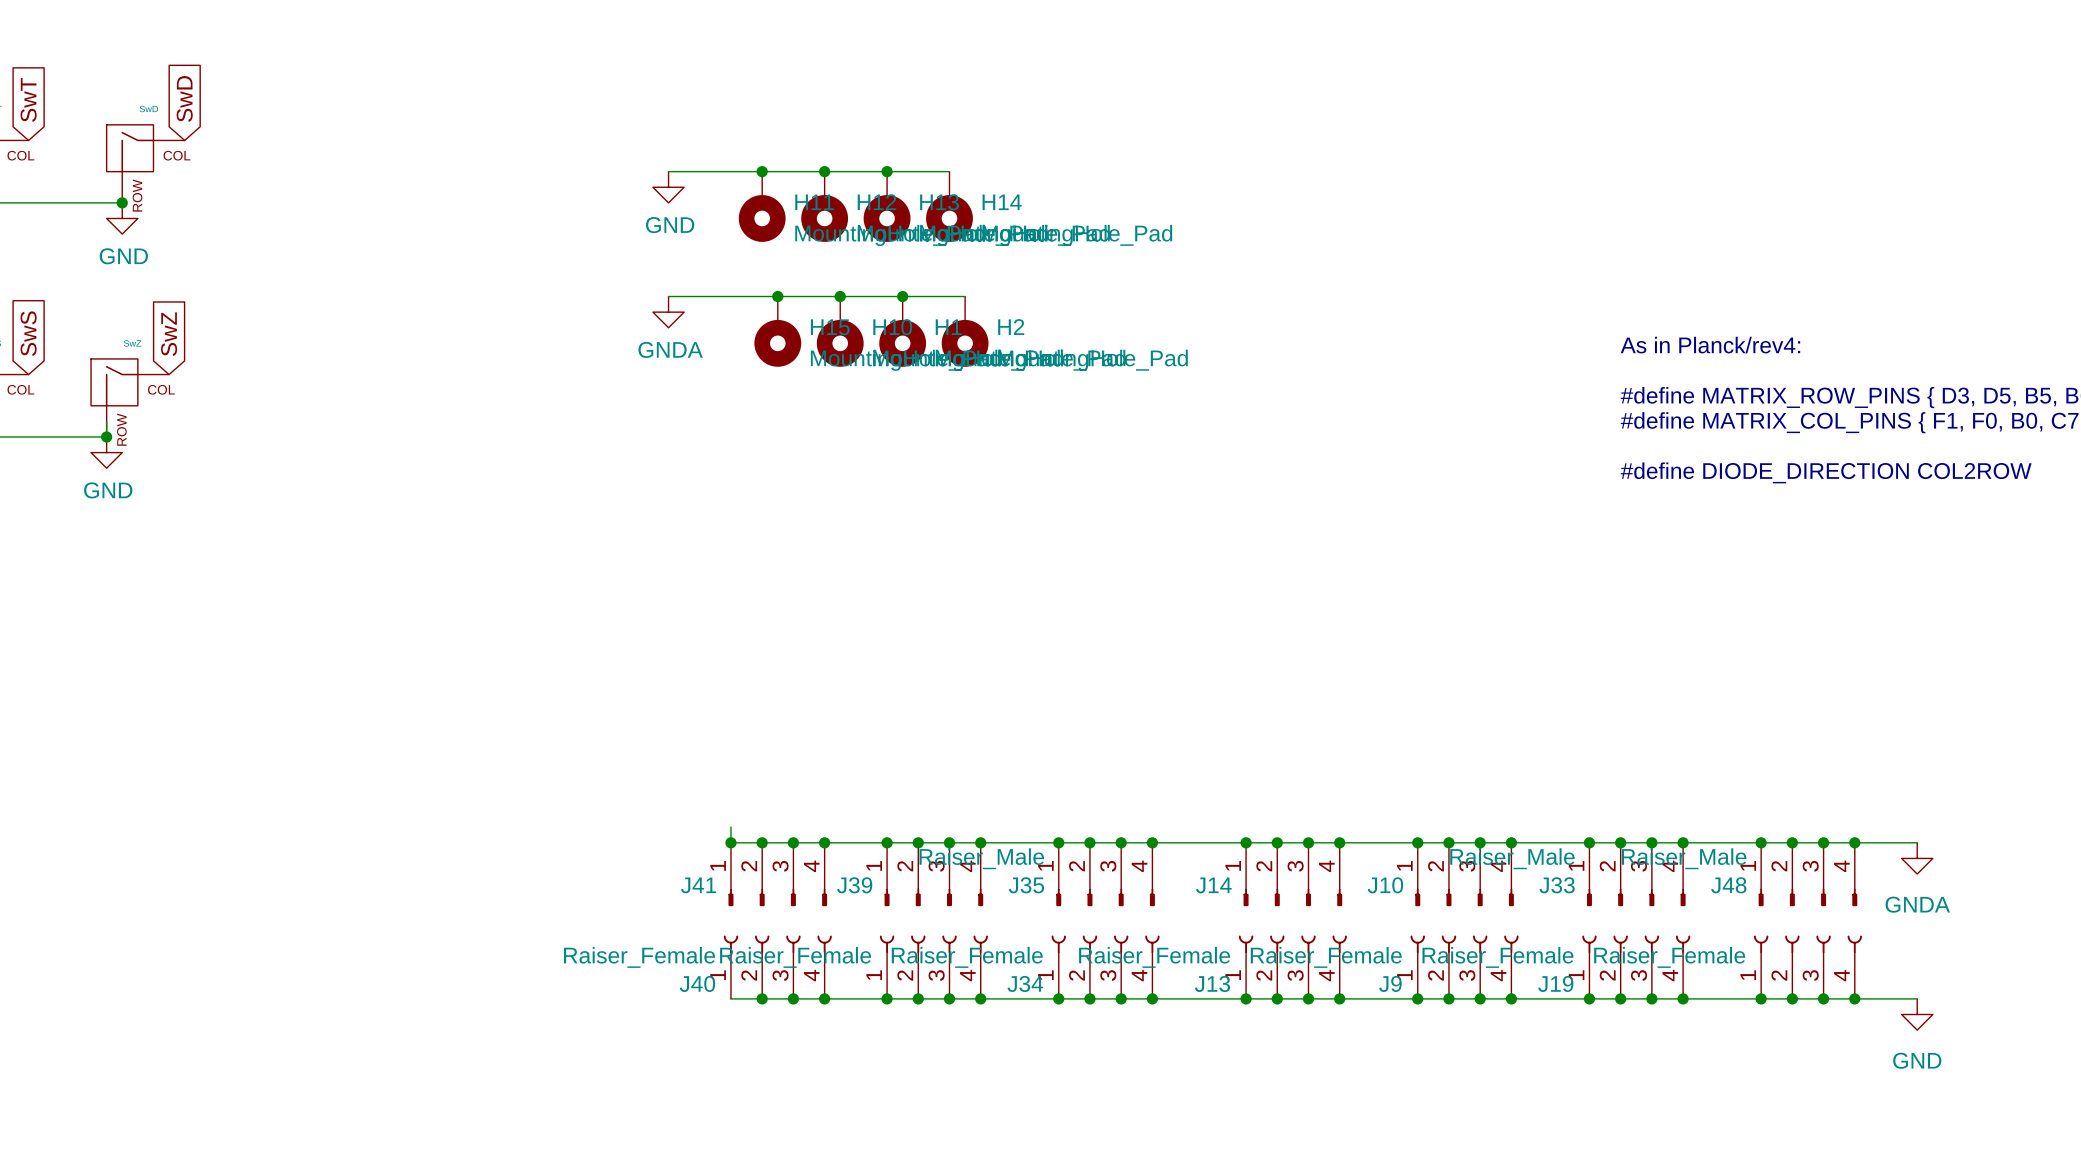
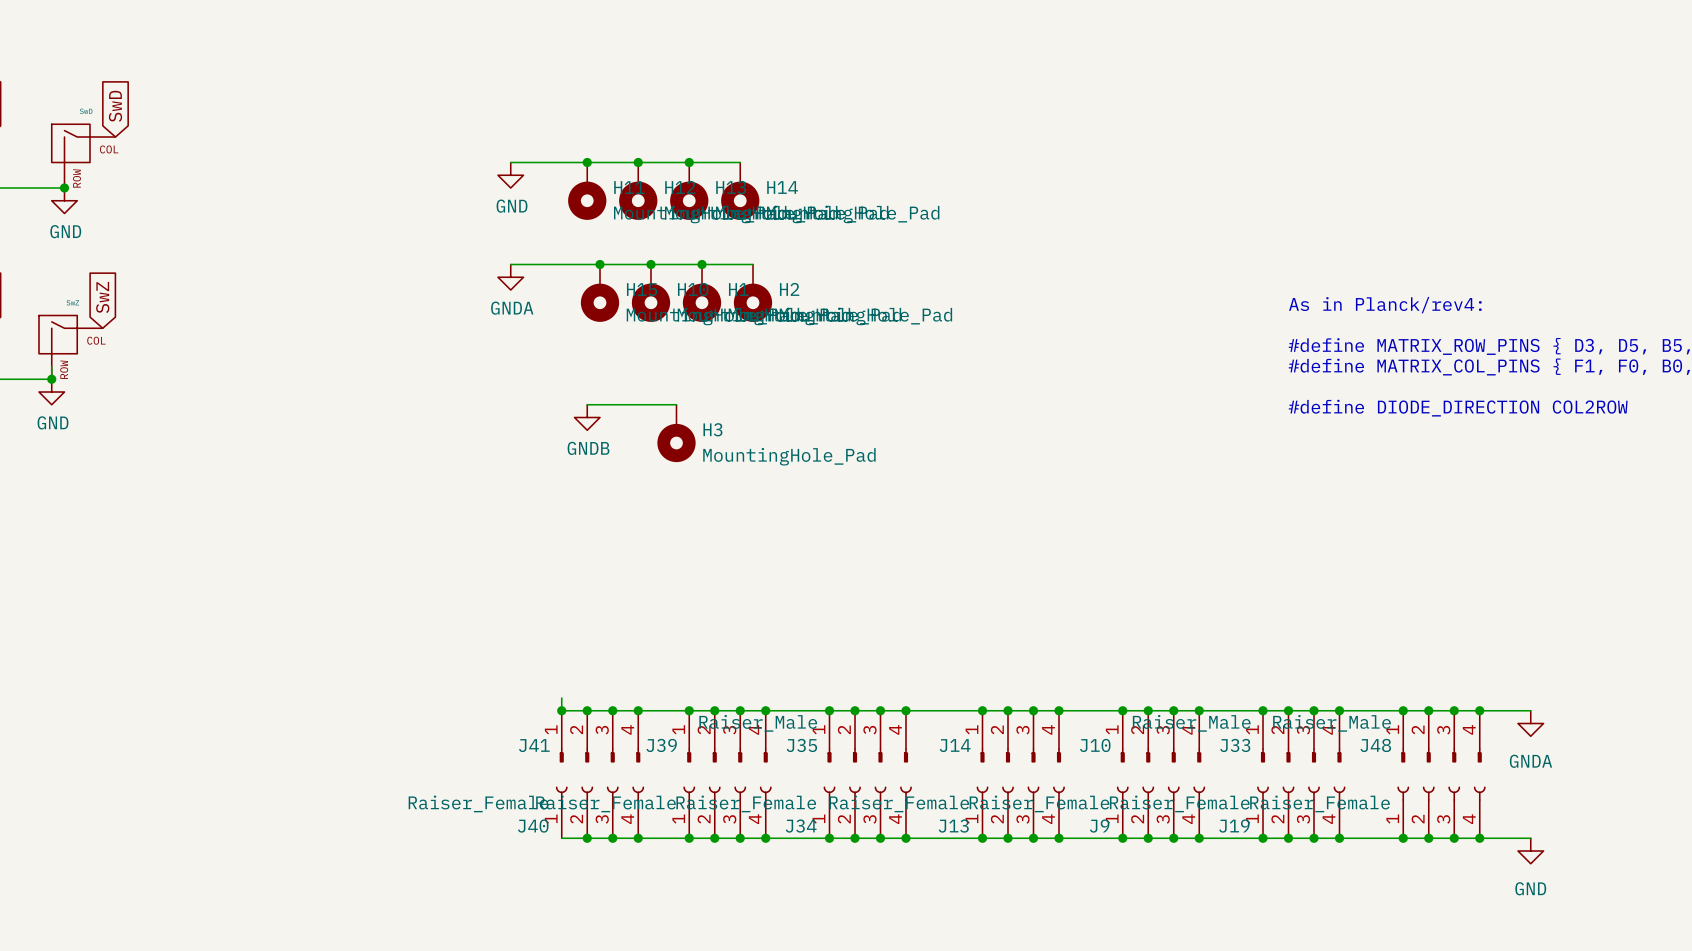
wire: none -> (587, 404) (676, 404)
power symbol: none -> GNDB (587, 417)
H3: none -> MountingHole_Pad (676, 433)

